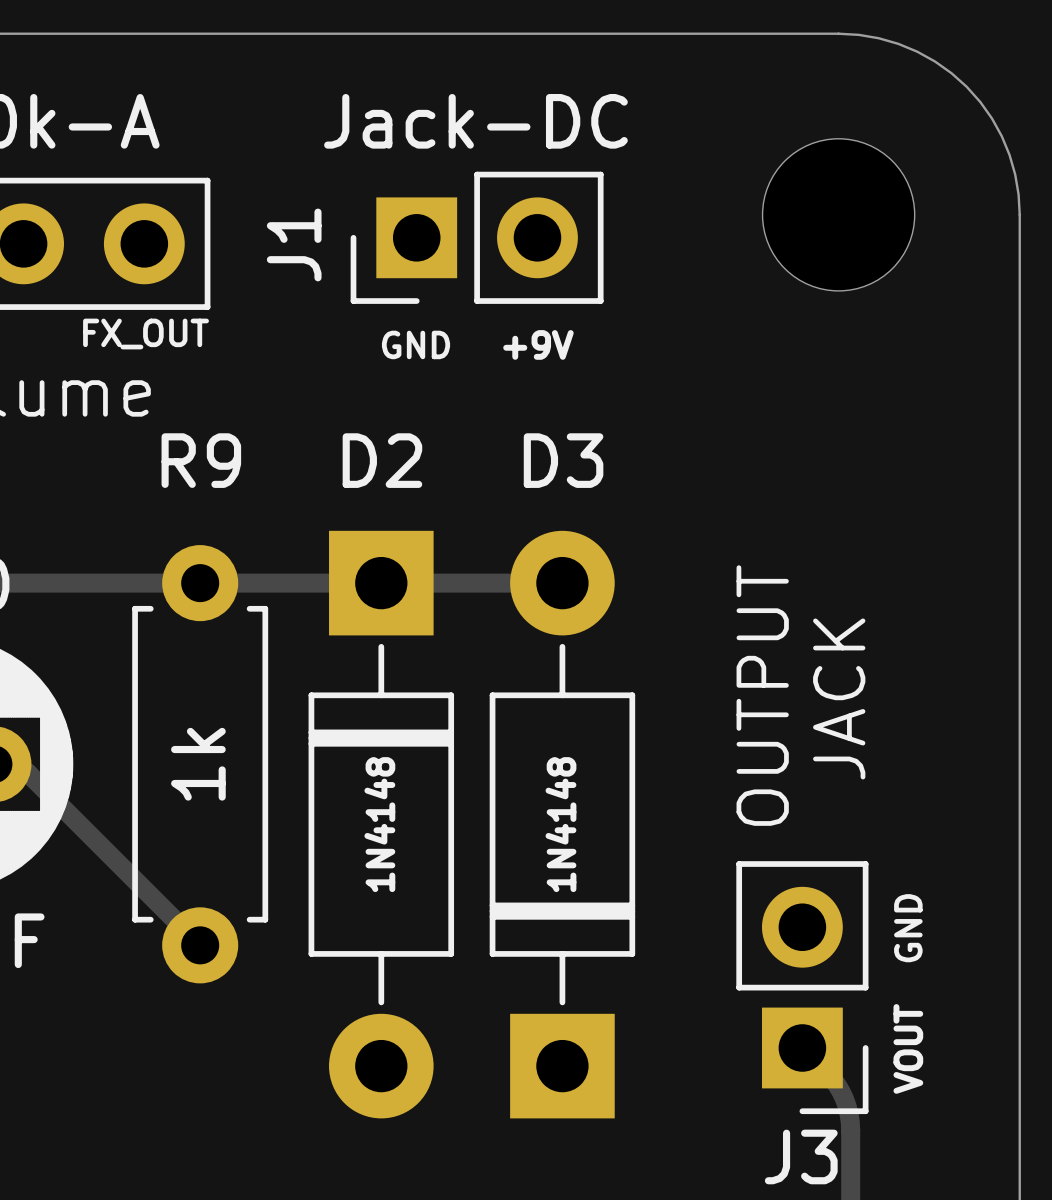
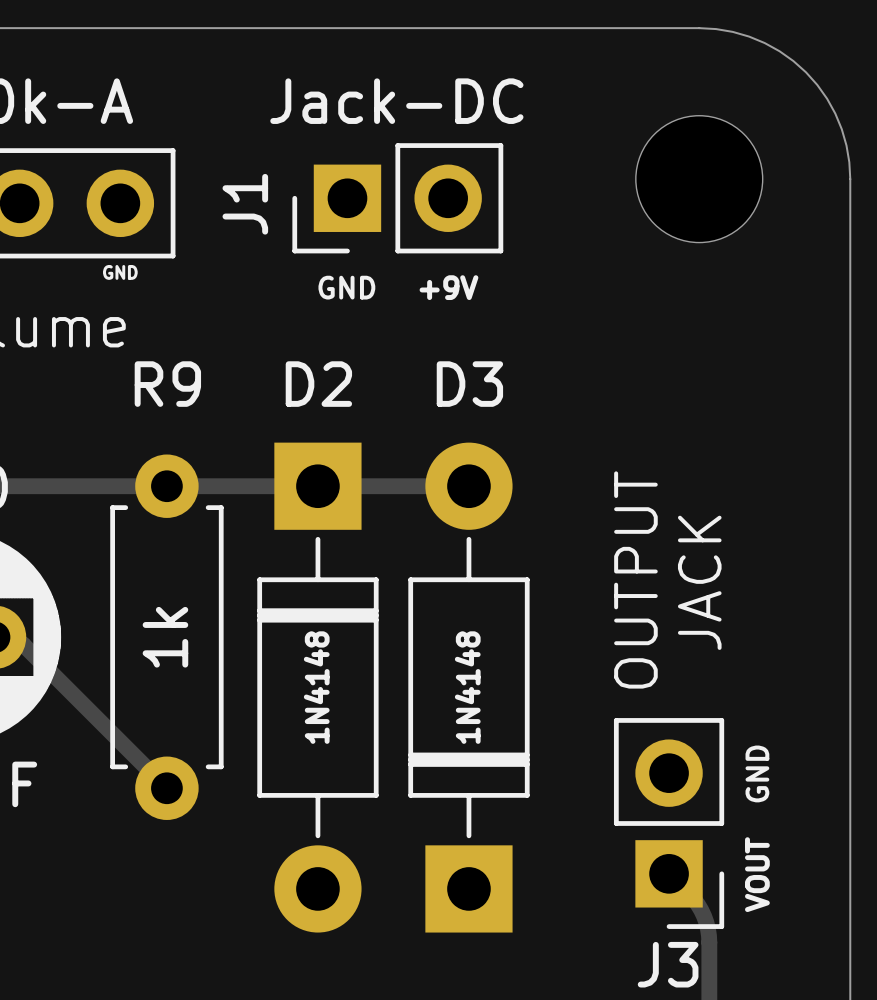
text: FX_OUT (146, 334) -> GND (120, 272)

